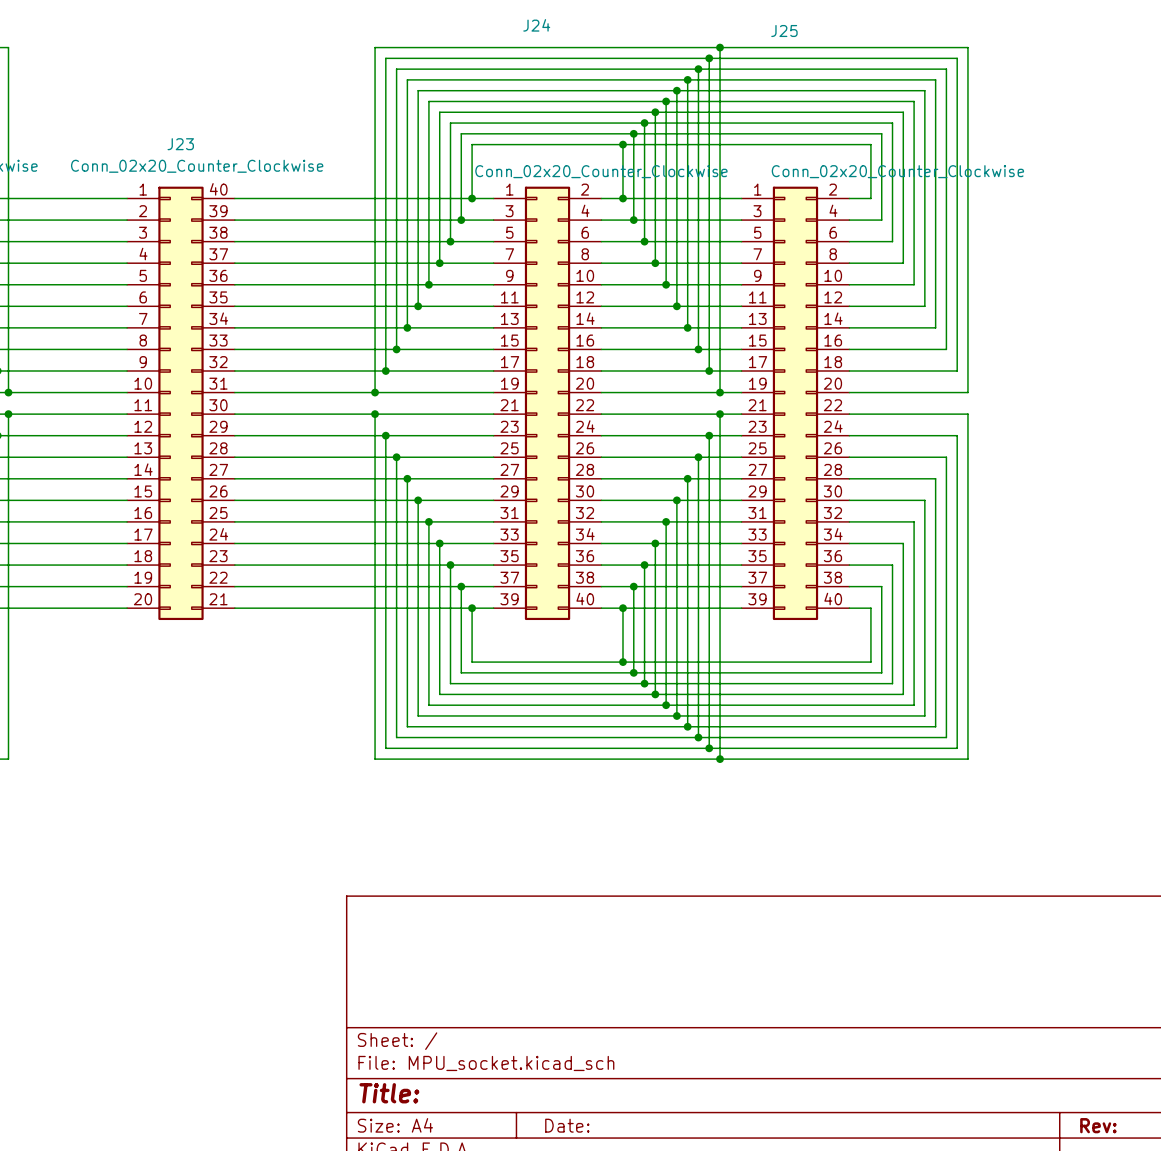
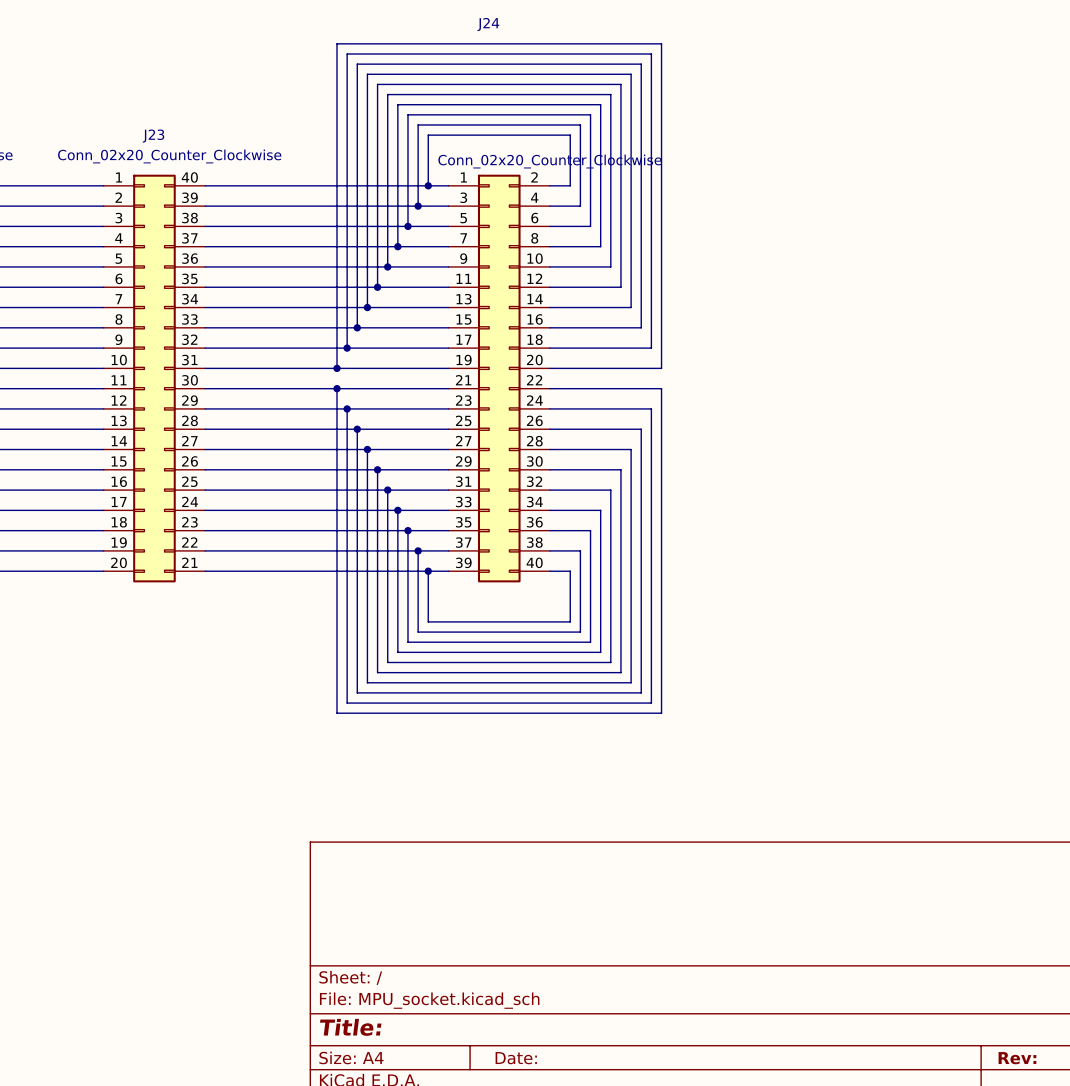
wire: (720, 47) (967, 47) (967, 392) (849, 392) -> none
junction: (720, 47) -> none
wire: (709, 58) (957, 58) (957, 370) (849, 370) -> none
junction: (709, 58) -> none
wire: (698, 69) (946, 69) (946, 349) (849, 349) -> none
junction: (698, 69) -> none
wire: (687, 79) (935, 79) (935, 327) (849, 327) -> none
junction: (687, 79) -> none
wire: (676, 90) (924, 90) (924, 306) (849, 306) -> none
junction: (676, 90) -> none
wire: (666, 101) (914, 101) (914, 284) (849, 284) -> none
junction: (666, 101) -> none
wire: (655, 112) (903, 112) (903, 263) (849, 263) -> none
junction: (655, 112) -> none
wire: (644, 123) (892, 123) (892, 241) (849, 241) -> none
junction: (644, 123) -> none
wire: (633, 133) (881, 133) (881, 220) (849, 220) -> none
junction: (633, 133) -> none
wire: (622, 144) (870, 144) (870, 198) (849, 198) -> none
junction: (622, 144) -> none
wire: (622, 198) (741, 198) -> none
junction: (622, 198) -> none
wire: (633, 220) (741, 220) -> none
junction: (633, 220) -> none
wire: (644, 241) (741, 241) -> none
junction: (644, 241) -> none
wire: (655, 263) (741, 263) -> none
junction: (655, 263) -> none
wire: (666, 284) (741, 284) -> none
junction: (666, 284) -> none
wire: (676, 306) (741, 306) -> none
junction: (676, 306) -> none
wire: (687, 327) (741, 327) -> none
junction: (687, 327) -> none
wire: (698, 349) (741, 349) -> none
junction: (698, 349) -> none
wire: (709, 370) (741, 370) -> none
junction: (709, 370) -> none
wire: (720, 392) (741, 392) -> none
junction: (720, 392) -> none
J25: Conn_02x20_Counter_Clockwise (795, 403) -> none
wire: (720, 414) (741, 414) -> none
junction: (720, 414) -> none
wire: (849, 414) (967, 414) (967, 759) (720, 759) -> none
wire: (709, 435) (741, 435) -> none
junction: (709, 435) -> none
wire: (849, 435) (957, 435) (957, 748) (709, 748) -> none
wire: (698, 457) (741, 457) -> none
junction: (698, 457) -> none
wire: (849, 457) (946, 457) (946, 737) (698, 737) -> none
wire: (687, 478) (741, 478) -> none
junction: (687, 478) -> none
wire: (849, 478) (935, 478) (935, 726) (687, 726) -> none
wire: (676, 500) (741, 500) -> none
junction: (676, 500) -> none
wire: (849, 500) (924, 500) (924, 715) (676, 715) -> none
wire: (666, 521) (741, 521) -> none
junction: (666, 521) -> none
wire: (849, 521) (914, 521) (914, 705) (666, 705) -> none
wire: (655, 543) (741, 543) -> none
junction: (655, 543) -> none
wire: (849, 543) (903, 543) (903, 694) (655, 694) -> none
wire: (644, 565) (741, 565) -> none
junction: (644, 565) -> none
wire: (849, 565) (892, 565) (892, 683) (644, 683) -> none
wire: (633, 586) (741, 586) -> none
junction: (633, 586) -> none
wire: (849, 586) (881, 586) (881, 672) (633, 672) -> none
wire: (622, 608) (741, 608) -> none
junction: (622, 608) -> none
wire: (849, 608) (870, 608) (870, 662) (622, 662) -> none
junction: (622, 662) -> none
junction: (633, 672) -> none
junction: (644, 683) -> none
junction: (655, 694) -> none
junction: (666, 705) -> none
junction: (676, 715) -> none
junction: (687, 726) -> none
junction: (698, 737) -> none
junction: (709, 748) -> none
junction: (720, 759) -> none

